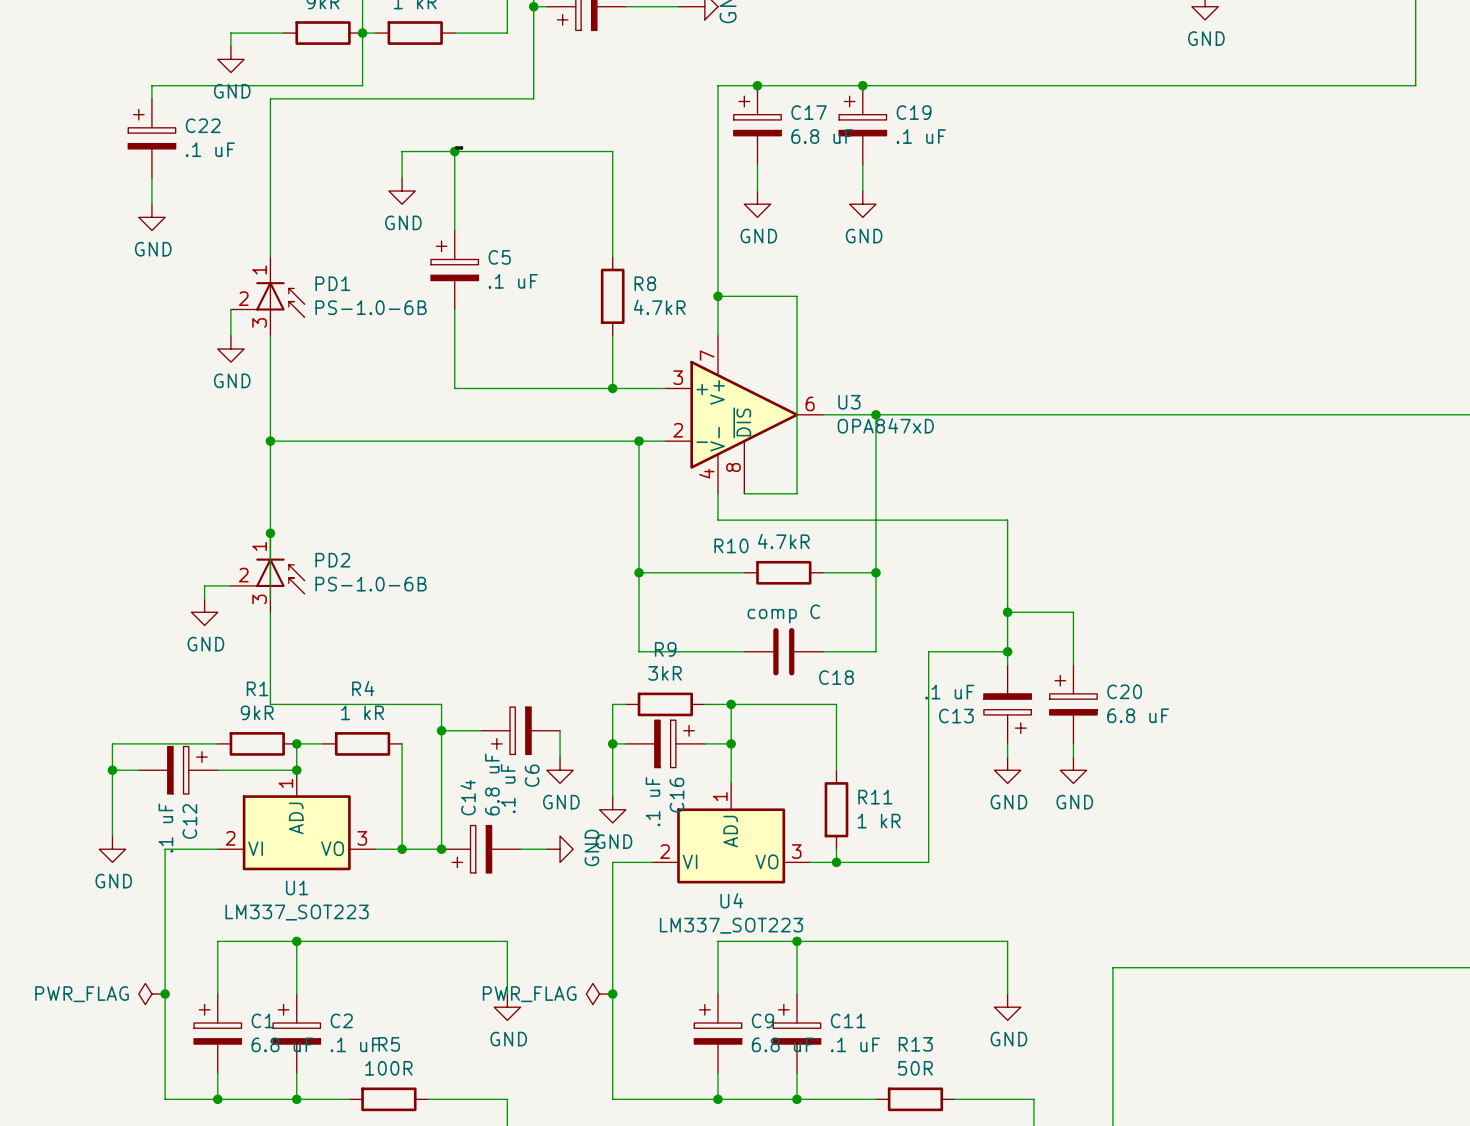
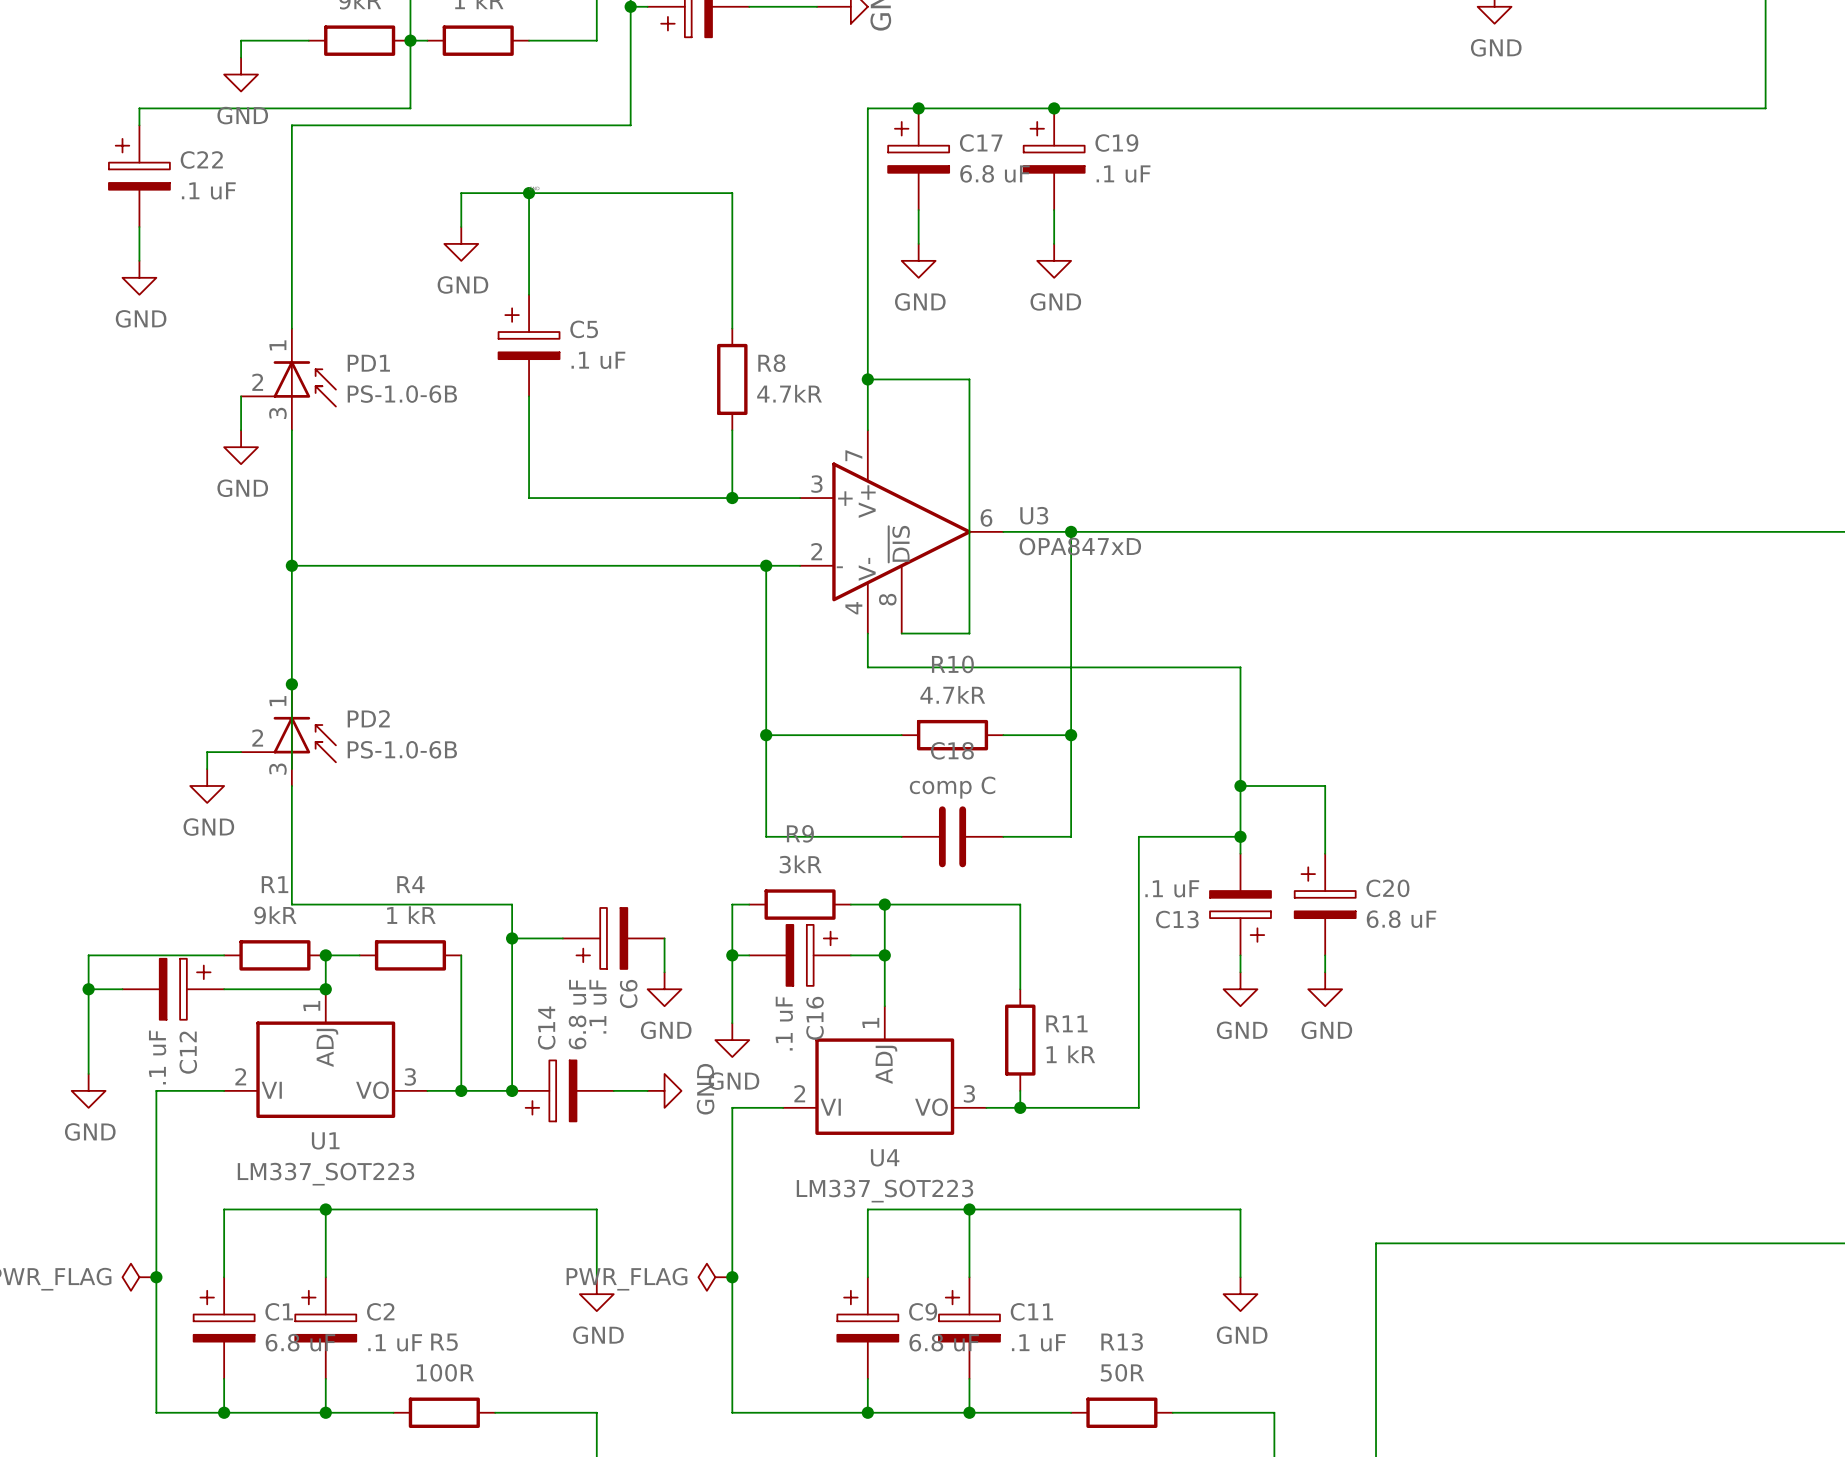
R10 name position: R10 (731, 545) -> R10 (952, 664)
C18 name position: C18 (836, 677) -> C18 (952, 750)

